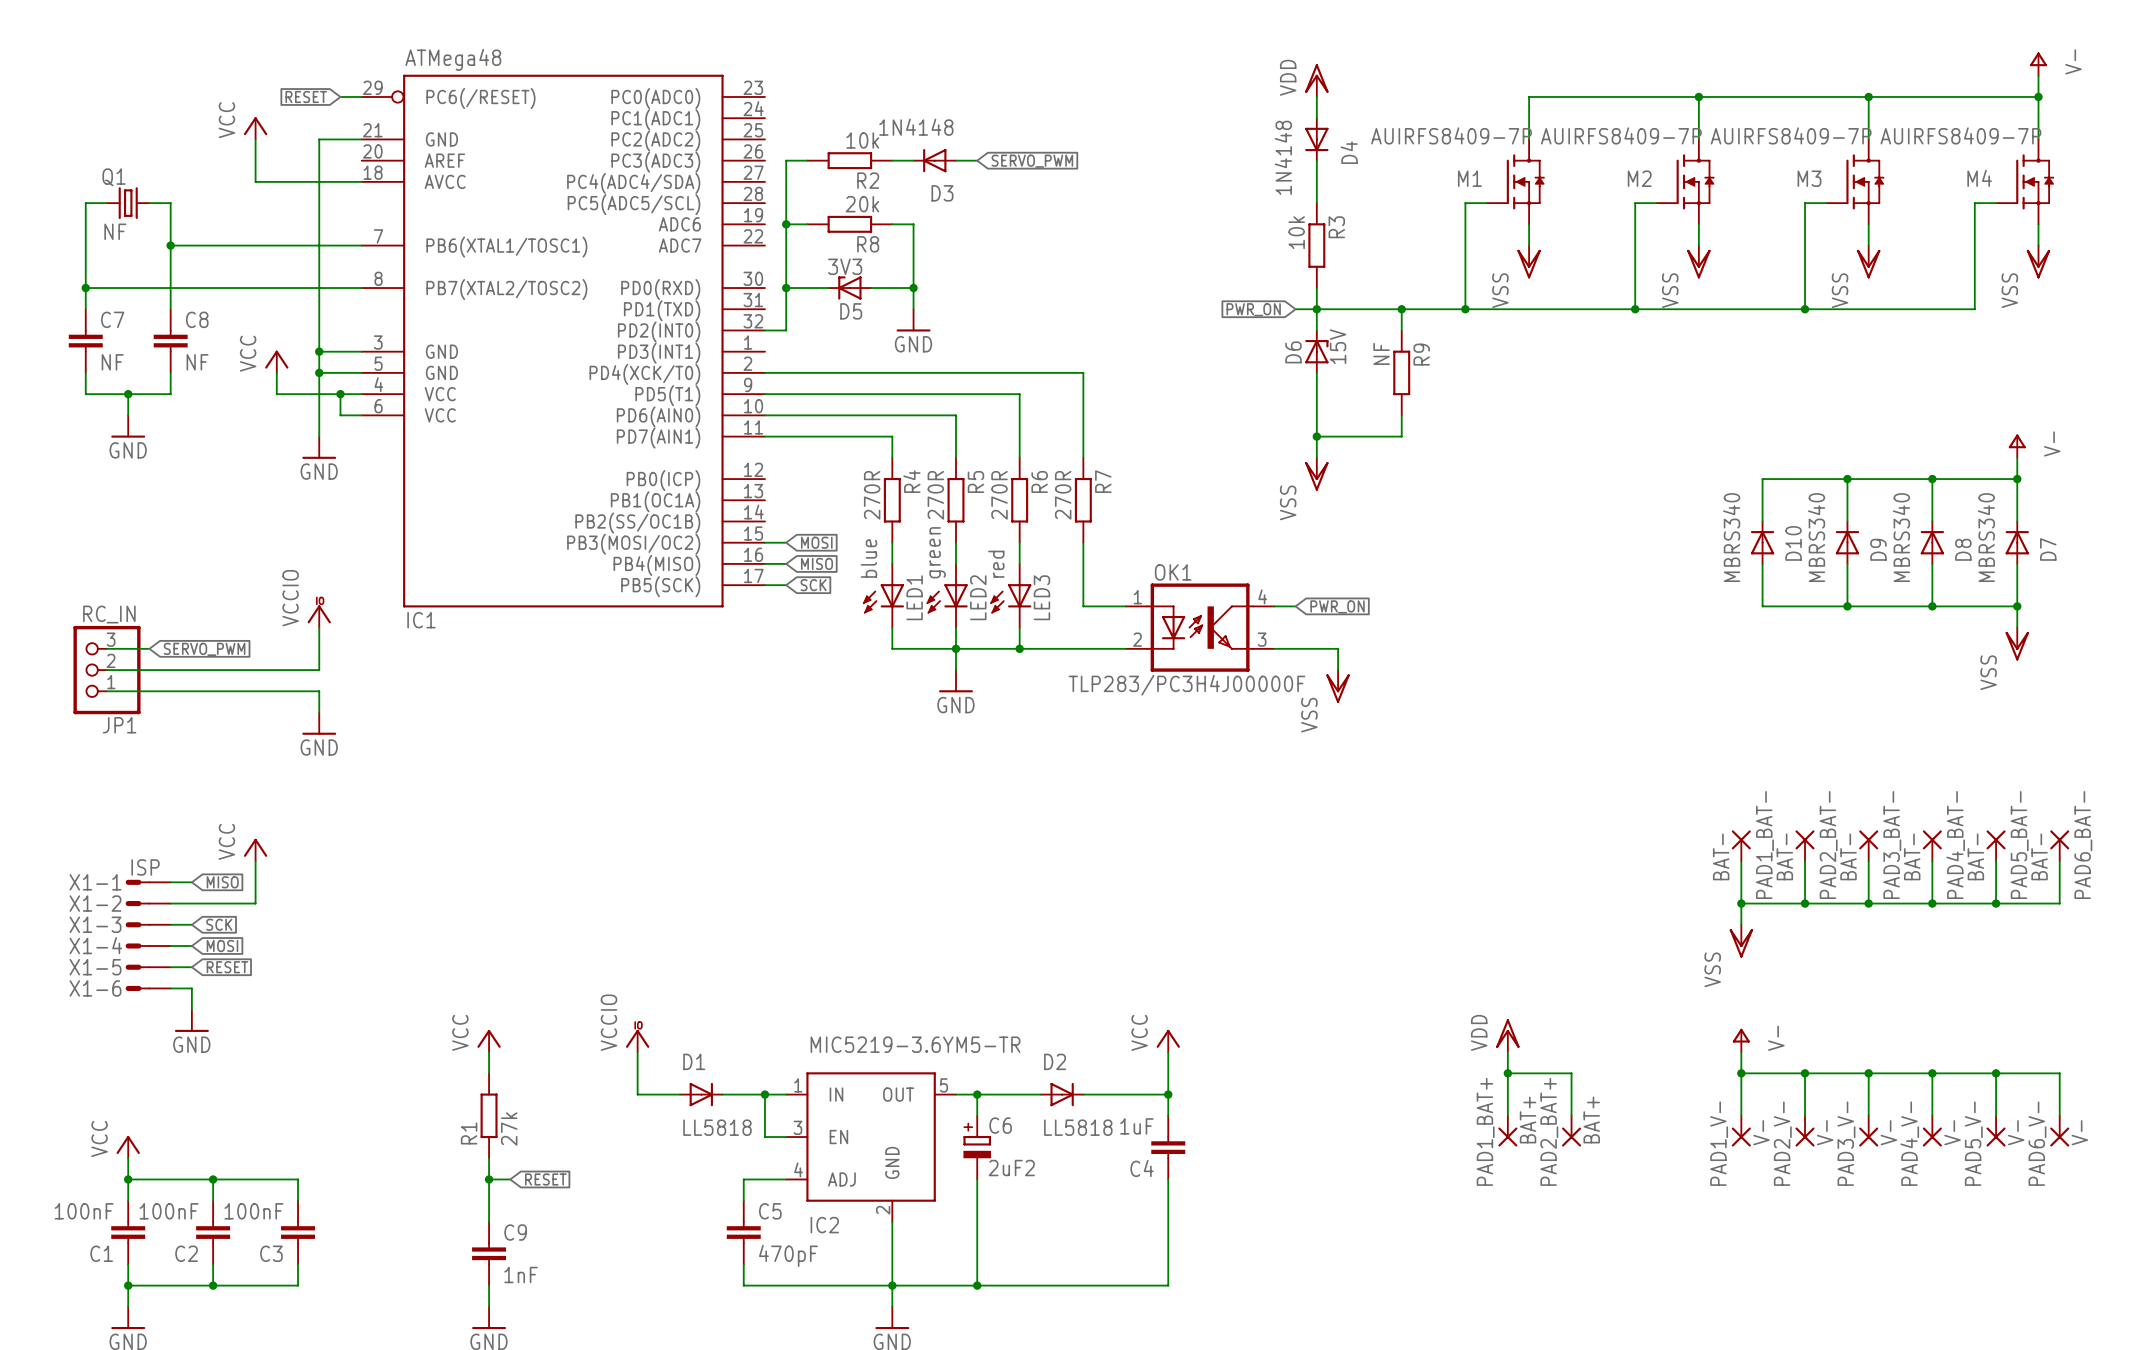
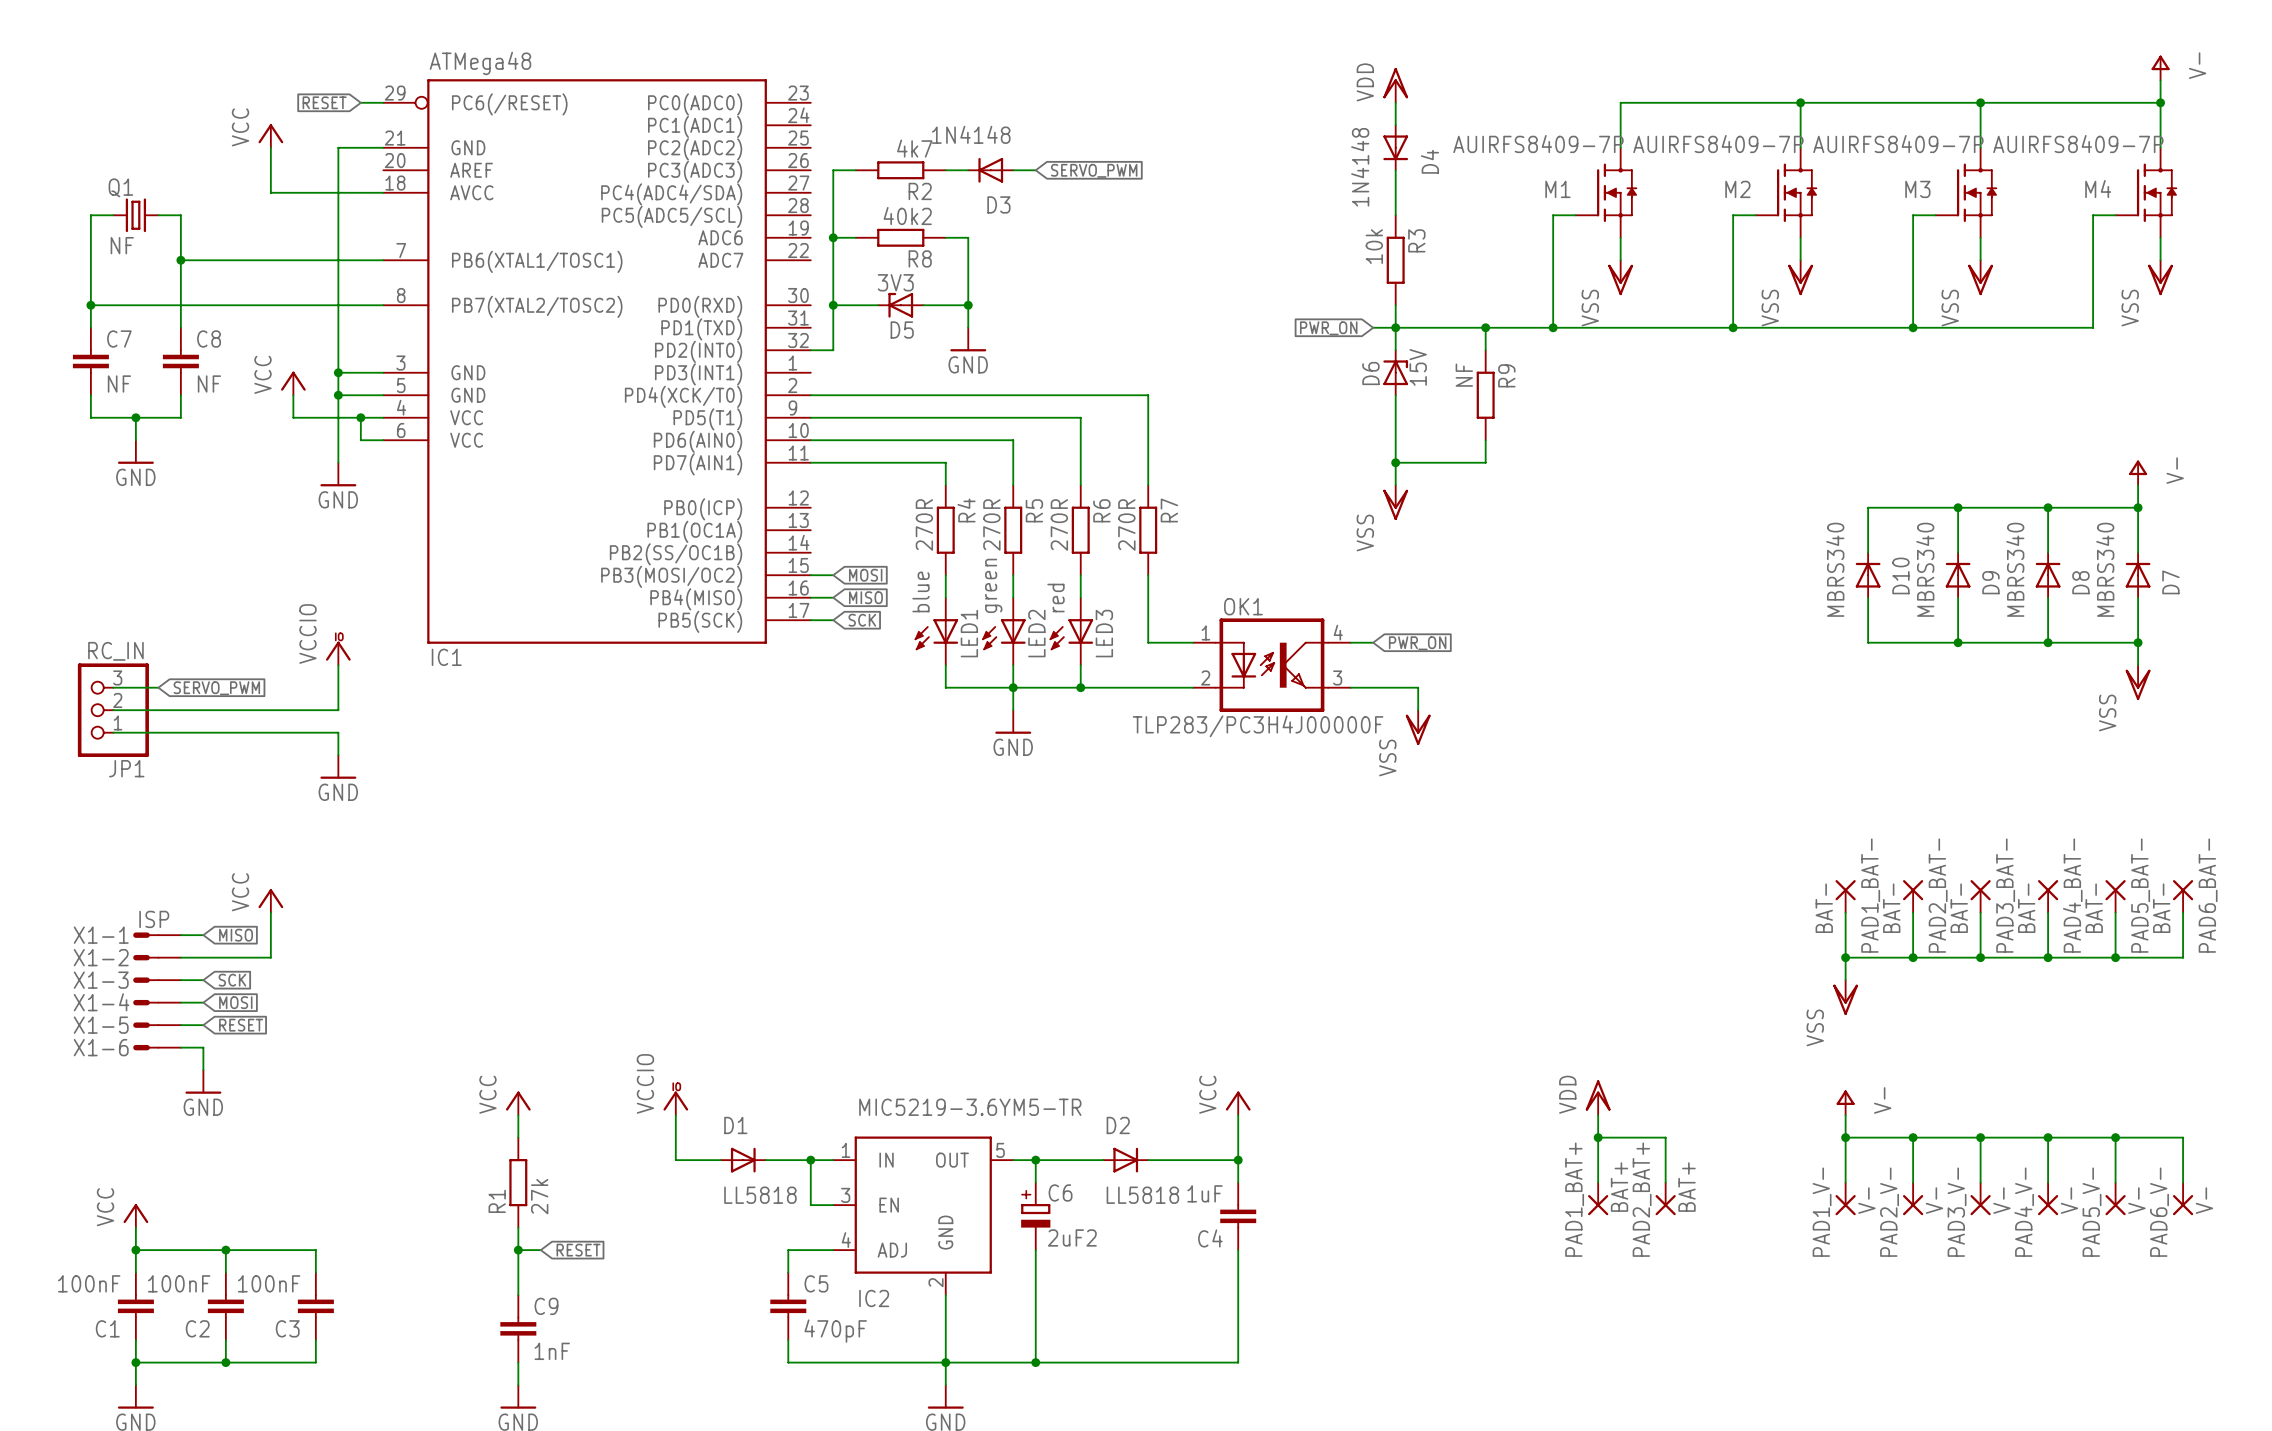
R2 value: 10k (862, 140) -> 4k7 (914, 148)
R8 value: 20k (862, 204) -> 40k2 (907, 216)

